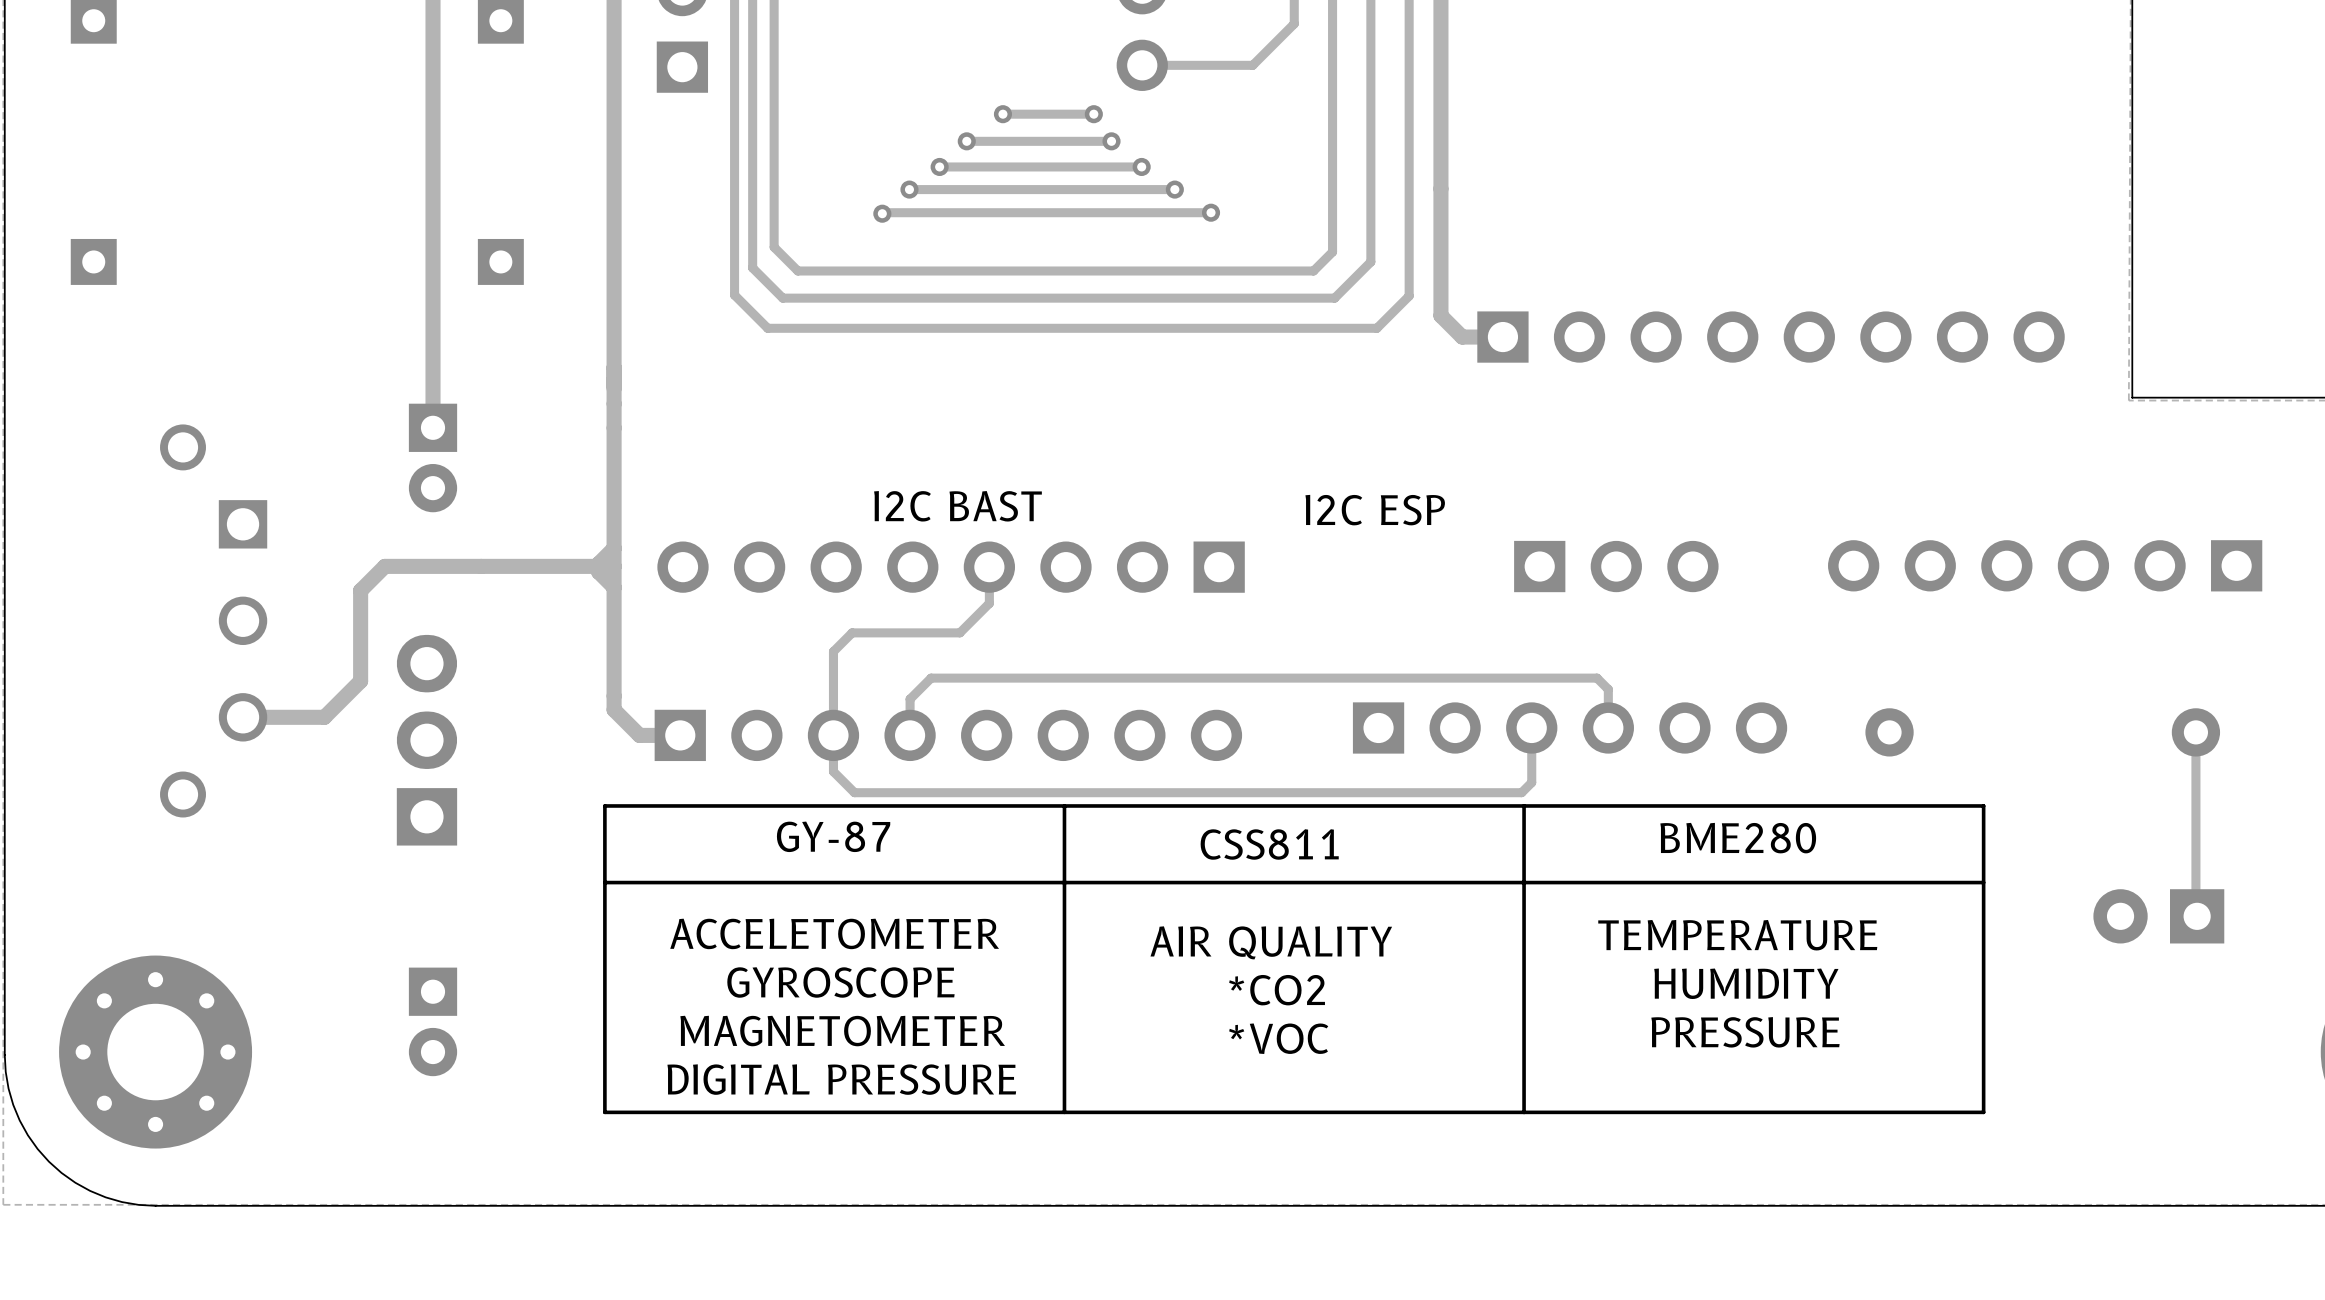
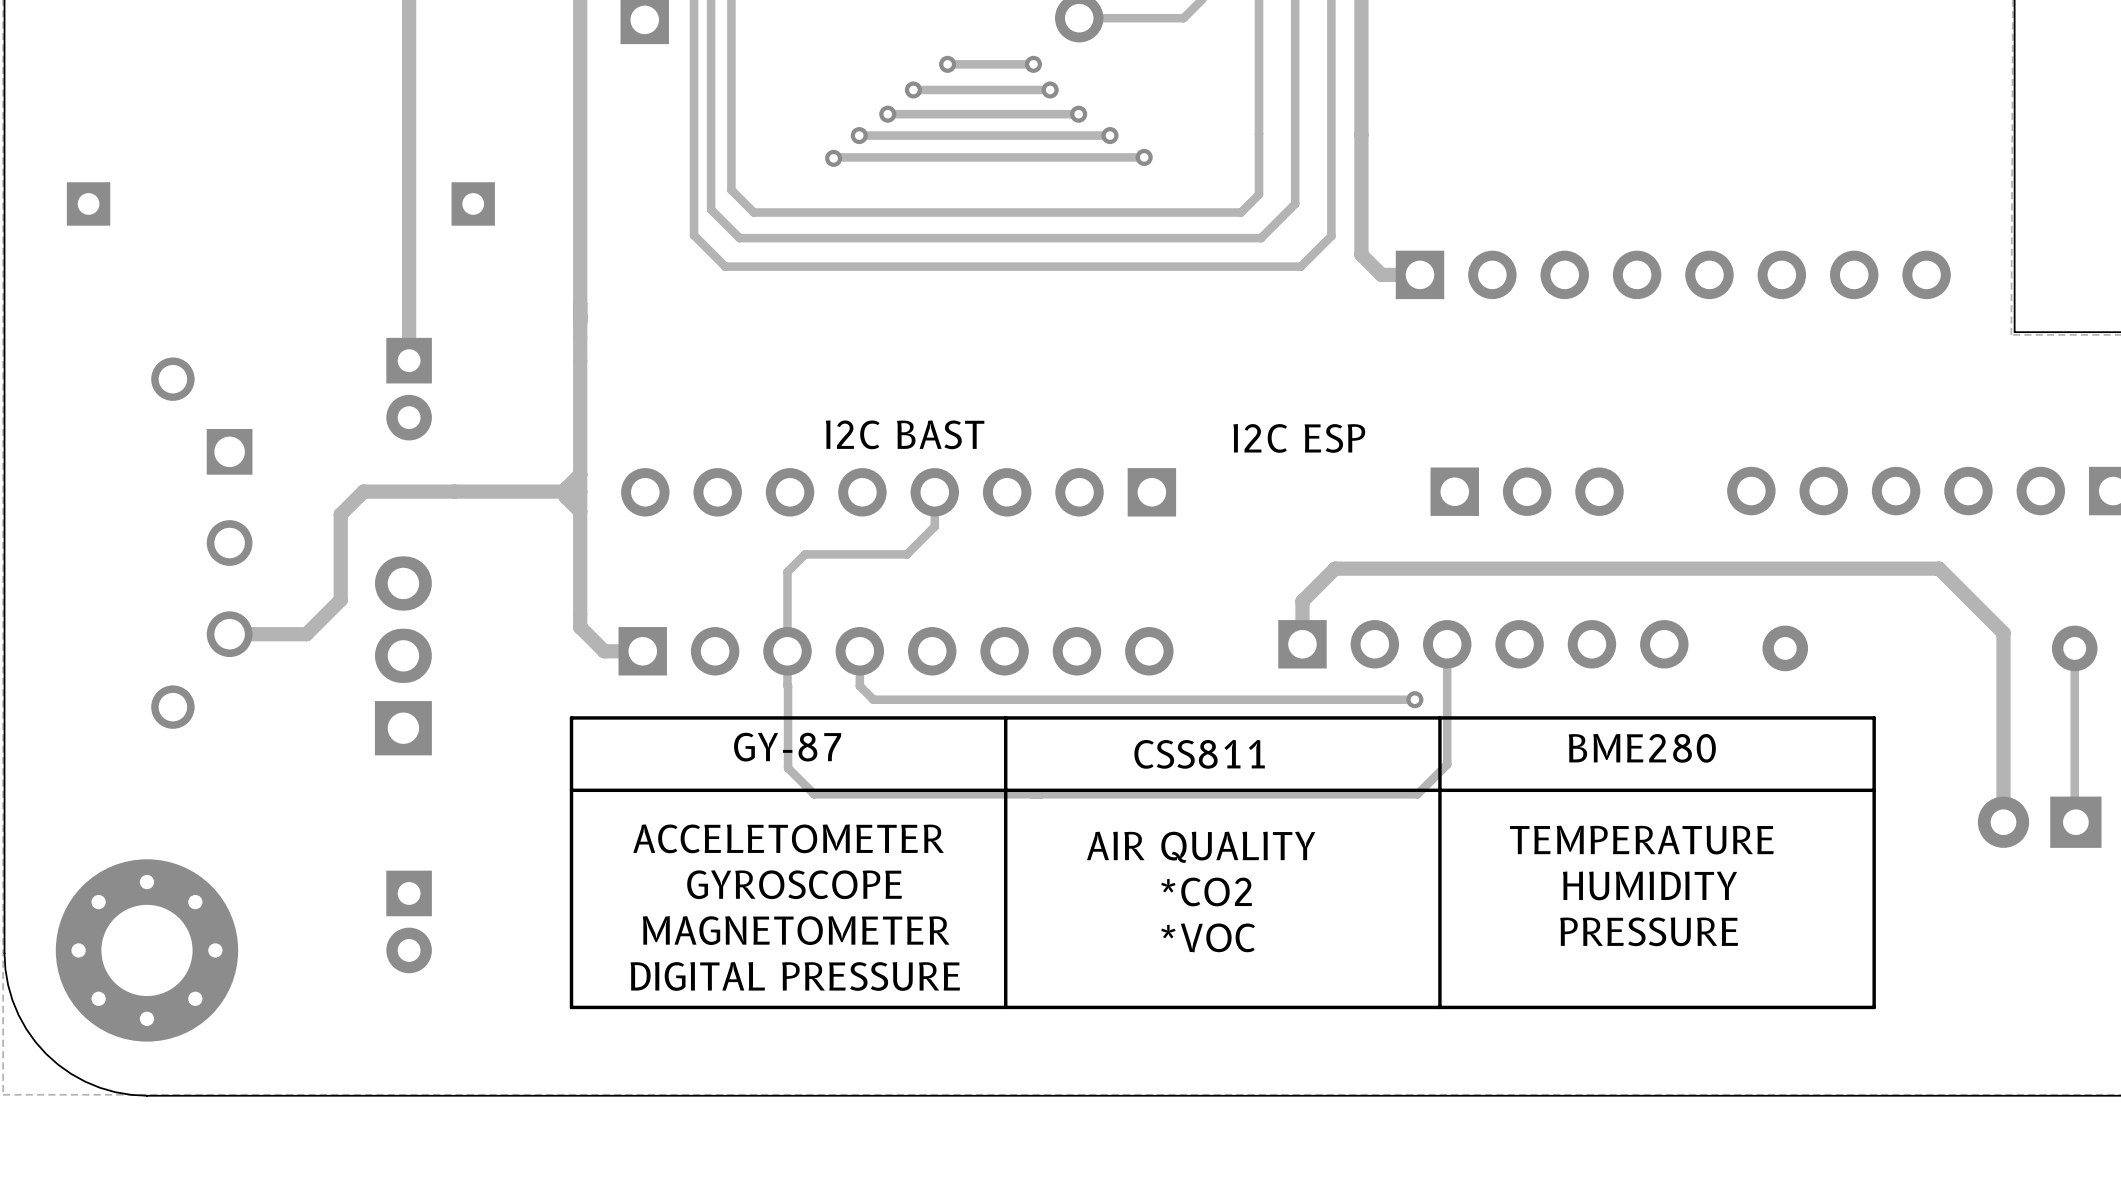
track: none -> (1302, 644) (1302, 601) (1335, 568) (1939, 568) (2003, 633) (2003, 822)
track: (1608, 727) (1608, 689) (1597, 678) (931, 678) (910, 699) (910, 735) -> (1414, 699) (873, 699) (859, 686) (859, 651)
track: (834, 772) (854, 792) (1521, 792) (1531, 782) -> (788, 686) (788, 768) (814, 794) (1417, 794) (1447, 764) (1447, 695)
via: none -> (1414, 699)

